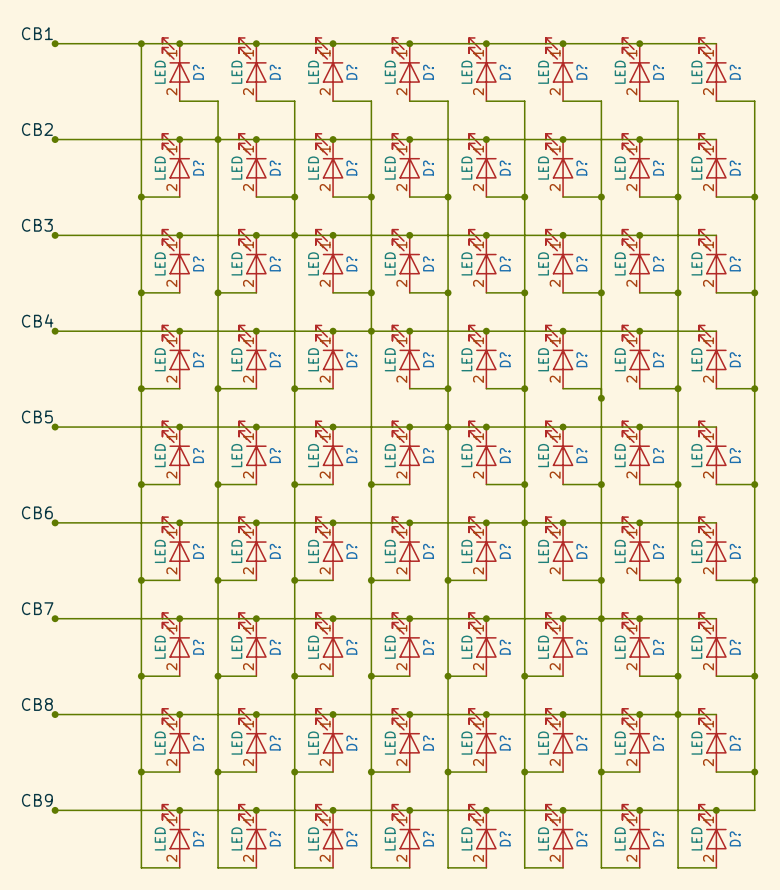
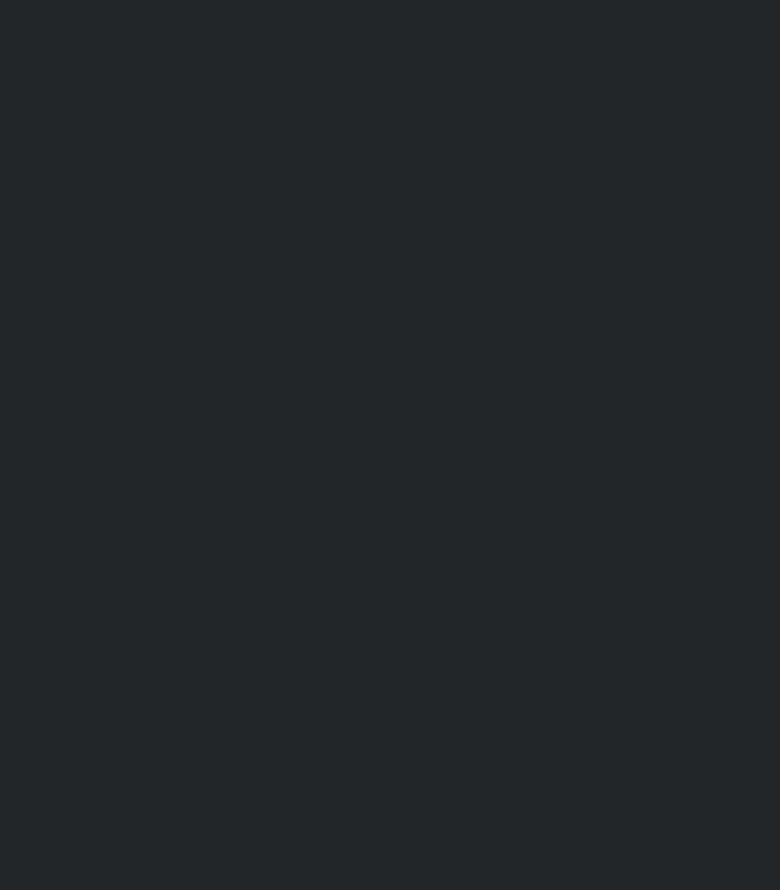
label: CB1 (37, 33) -> none
wire: (55, 43) (716, 43) -> none
junction: (55, 43) -> none
wire: (141, 43) (141, 867) (179, 867) -> none
junction: (141, 43) -> none
junction: (179, 43) -> none
junction: (256, 43) -> none
junction: (333, 43) -> none
junction: (409, 43) -> none
junction: (486, 43) -> none
junction: (563, 43) -> none
junction: (639, 43) -> none
D?: LED (176, 69) -> none
D?: LED (252, 69) -> none
D?: LED (329, 69) -> none
D?: LED (406, 69) -> none
D?: LED (482, 69) -> none
D?: LED (559, 69) -> none
D?: LED (636, 69) -> none
D?: LED (712, 69) -> none
wire: (179, 101) (218, 101) (218, 867) (256, 867) -> none
wire: (256, 101) (294, 101) (294, 867) (333, 867) -> none
wire: (333, 101) (371, 101) (371, 867) (409, 867) -> none
wire: (409, 101) (448, 101) (448, 867) (486, 867) -> none
wire: (486, 101) (524, 101) (524, 867) (563, 867) -> none
wire: (563, 101) (601, 101) (601, 867) (639, 867) -> none
wire: (639, 101) (678, 101) (678, 867) (716, 867) -> none
wire: (716, 101) (754, 101) (754, 810) (55, 810) -> none
label: CB2 (37, 129) -> none
wire: (55, 139) (716, 139) -> none
junction: (55, 139) -> none
junction: (179, 139) -> none
junction: (218, 139) -> none
junction: (256, 139) -> none
junction: (333, 139) -> none
junction: (409, 139) -> none
junction: (486, 139) -> none
junction: (563, 139) -> none
junction: (639, 139) -> none
D?: LED (176, 165) -> none
D?: LED (252, 165) -> none
D?: LED (329, 165) -> none
D?: LED (406, 165) -> none
D?: LED (482, 165) -> none
D?: LED (559, 165) -> none
D?: LED (636, 165) -> none
D?: LED (712, 165) -> none
wire: (141, 197) (179, 197) -> none
junction: (141, 197) -> none
wire: (256, 197) (294, 197) -> none
junction: (294, 197) -> none
wire: (333, 197) (371, 197) -> none
junction: (371, 197) -> none
wire: (409, 197) (448, 197) -> none
junction: (448, 197) -> none
wire: (486, 197) (524, 197) -> none
junction: (524, 197) -> none
wire: (563, 197) (601, 197) -> none
junction: (601, 197) -> none
wire: (639, 197) (678, 197) -> none
junction: (678, 197) -> none
wire: (716, 197) (754, 197) -> none
junction: (754, 197) -> none
label: CB3 (37, 225) -> none
wire: (55, 235) (716, 235) -> none
junction: (55, 235) -> none
junction: (179, 235) -> none
junction: (256, 235) -> none
junction: (294, 235) -> none
junction: (333, 235) -> none
junction: (409, 235) -> none
junction: (486, 235) -> none
junction: (563, 235) -> none
junction: (639, 235) -> none
D?: LED (176, 261) -> none
D?: LED (252, 261) -> none
D?: LED (329, 261) -> none
D?: LED (406, 261) -> none
D?: LED (482, 261) -> none
D?: LED (559, 261) -> none
D?: LED (636, 261) -> none
D?: LED (712, 261) -> none
wire: (141, 292) (179, 292) -> none
junction: (141, 292) -> none
wire: (218, 292) (256, 292) -> none
junction: (218, 292) -> none
wire: (333, 292) (371, 292) -> none
junction: (371, 292) -> none
wire: (409, 292) (448, 292) -> none
junction: (448, 292) -> none
wire: (486, 292) (524, 292) -> none
junction: (524, 292) -> none
wire: (563, 292) (601, 292) -> none
junction: (601, 292) -> none
wire: (639, 292) (678, 292) -> none
junction: (678, 292) -> none
wire: (716, 292) (754, 292) -> none
junction: (754, 292) -> none
label: CB4 (37, 320) -> none
wire: (55, 331) (716, 331) -> none
junction: (55, 331) -> none
junction: (179, 331) -> none
junction: (256, 331) -> none
junction: (333, 331) -> none
junction: (371, 331) -> none
junction: (409, 331) -> none
junction: (486, 331) -> none
junction: (563, 331) -> none
junction: (639, 331) -> none
D?: LED (176, 357) -> none
D?: LED (252, 357) -> none
D?: LED (329, 357) -> none
D?: LED (406, 357) -> none
D?: LED (482, 357) -> none
D?: LED (559, 357) -> none
D?: LED (636, 357) -> none
D?: LED (712, 357) -> none
wire: (141, 388) (179, 388) -> none
junction: (141, 388) -> none
wire: (218, 388) (256, 388) -> none
junction: (218, 388) -> none
wire: (294, 388) (333, 388) -> none
junction: (294, 388) -> none
wire: (409, 388) (448, 388) -> none
junction: (448, 388) -> none
wire: (486, 388) (524, 388) -> none
junction: (524, 388) -> none
wire: (563, 388) (601, 388) -> none
wire: (639, 388) (678, 388) -> none
junction: (678, 388) -> none
wire: (716, 388) (754, 388) -> none
junction: (754, 388) -> none
junction: (601, 398) -> none
label: CB5 (37, 417) -> none
wire: (55, 427) (716, 427) -> none
junction: (55, 427) -> none
junction: (179, 427) -> none
junction: (256, 427) -> none
junction: (333, 427) -> none
junction: (409, 427) -> none
junction: (448, 427) -> none
junction: (486, 427) -> none
junction: (563, 427) -> none
junction: (639, 427) -> none
D?: LED (176, 452) -> none
D?: LED (252, 452) -> none
D?: LED (329, 452) -> none
D?: LED (406, 452) -> none
D?: LED (482, 452) -> none
D?: LED (559, 452) -> none
D?: LED (636, 452) -> none
D?: LED (712, 452) -> none
wire: (141, 484) (179, 484) -> none
junction: (141, 484) -> none
wire: (218, 484) (256, 484) -> none
junction: (218, 484) -> none
wire: (294, 484) (333, 484) -> none
junction: (294, 484) -> none
wire: (371, 484) (409, 484) -> none
junction: (371, 484) -> none
wire: (486, 484) (524, 484) -> none
junction: (524, 484) -> none
wire: (563, 484) (601, 484) -> none
junction: (601, 484) -> none
wire: (639, 484) (678, 484) -> none
junction: (678, 484) -> none
wire: (716, 484) (754, 484) -> none
junction: (754, 484) -> none
label: CB6 (37, 512) -> none
wire: (55, 522) (716, 522) -> none
junction: (55, 522) -> none
junction: (179, 522) -> none
junction: (256, 522) -> none
junction: (333, 522) -> none
junction: (409, 522) -> none
junction: (486, 522) -> none
junction: (524, 522) -> none
junction: (563, 522) -> none
junction: (639, 522) -> none
D?: LED (176, 548) -> none
D?: LED (252, 548) -> none
D?: LED (329, 548) -> none
D?: LED (406, 548) -> none
D?: LED (482, 548) -> none
D?: LED (559, 548) -> none
D?: LED (636, 548) -> none
D?: LED (712, 548) -> none
wire: (141, 580) (179, 580) -> none
junction: (141, 580) -> none
wire: (218, 580) (256, 580) -> none
junction: (218, 580) -> none
wire: (294, 580) (333, 580) -> none
junction: (294, 580) -> none
wire: (371, 580) (409, 580) -> none
junction: (371, 580) -> none
wire: (448, 580) (486, 580) -> none
junction: (448, 580) -> none
wire: (563, 580) (601, 580) -> none
junction: (601, 580) -> none
wire: (639, 580) (678, 580) -> none
junction: (678, 580) -> none
wire: (716, 580) (754, 580) -> none
junction: (754, 580) -> none
label: CB7 (37, 608) -> none
wire: (55, 618) (716, 618) -> none
junction: (55, 618) -> none
junction: (179, 618) -> none
junction: (256, 618) -> none
junction: (333, 618) -> none
junction: (409, 618) -> none
junction: (486, 618) -> none
junction: (563, 618) -> none
junction: (601, 618) -> none
junction: (639, 618) -> none
D?: LED (176, 644) -> none
D?: LED (252, 644) -> none
D?: LED (329, 644) -> none
D?: LED (406, 644) -> none
D?: LED (482, 644) -> none
D?: LED (559, 644) -> none
D?: LED (636, 644) -> none
D?: LED (712, 644) -> none
wire: (141, 676) (179, 676) -> none
junction: (141, 676) -> none
wire: (218, 676) (256, 676) -> none
junction: (218, 676) -> none
wire: (294, 676) (333, 676) -> none
junction: (294, 676) -> none
wire: (371, 676) (409, 676) -> none
junction: (371, 676) -> none
wire: (448, 676) (486, 676) -> none
junction: (448, 676) -> none
wire: (524, 676) (563, 676) -> none
junction: (524, 676) -> none
wire: (639, 676) (678, 676) -> none
junction: (678, 676) -> none
wire: (716, 676) (754, 676) -> none
junction: (754, 676) -> none
label: CB8 (37, 704) -> none
wire: (55, 714) (716, 714) -> none
junction: (55, 714) -> none
junction: (179, 714) -> none
junction: (256, 714) -> none
junction: (333, 714) -> none
junction: (409, 714) -> none
junction: (486, 714) -> none
junction: (563, 714) -> none
junction: (639, 714) -> none
junction: (678, 714) -> none
D?: LED (176, 740) -> none
D?: LED (252, 740) -> none
D?: LED (329, 740) -> none
D?: LED (406, 740) -> none
D?: LED (482, 740) -> none
D?: LED (559, 740) -> none
D?: LED (636, 740) -> none
D?: LED (712, 740) -> none
wire: (141, 772) (179, 772) -> none
junction: (141, 772) -> none
wire: (218, 772) (256, 772) -> none
junction: (218, 772) -> none
wire: (294, 772) (333, 772) -> none
junction: (294, 772) -> none
wire: (371, 772) (409, 772) -> none
junction: (371, 772) -> none
wire: (448, 772) (486, 772) -> none
junction: (448, 772) -> none
wire: (524, 772) (563, 772) -> none
junction: (524, 772) -> none
wire: (601, 772) (639, 772) -> none
junction: (601, 772) -> none
wire: (716, 772) (754, 772) -> none
junction: (754, 772) -> none
label: CB9 (37, 800) -> none
junction: (55, 810) -> none
junction: (179, 810) -> none
junction: (256, 810) -> none
junction: (333, 810) -> none
junction: (409, 810) -> none
junction: (486, 810) -> none
junction: (563, 810) -> none
junction: (639, 810) -> none
junction: (716, 810) -> none
D?: LED (176, 836) -> none
D?: LED (252, 836) -> none
D?: LED (329, 836) -> none
D?: LED (406, 836) -> none
D?: LED (482, 836) -> none
D?: LED (559, 836) -> none
D?: LED (636, 836) -> none
D?: LED (712, 836) -> none

